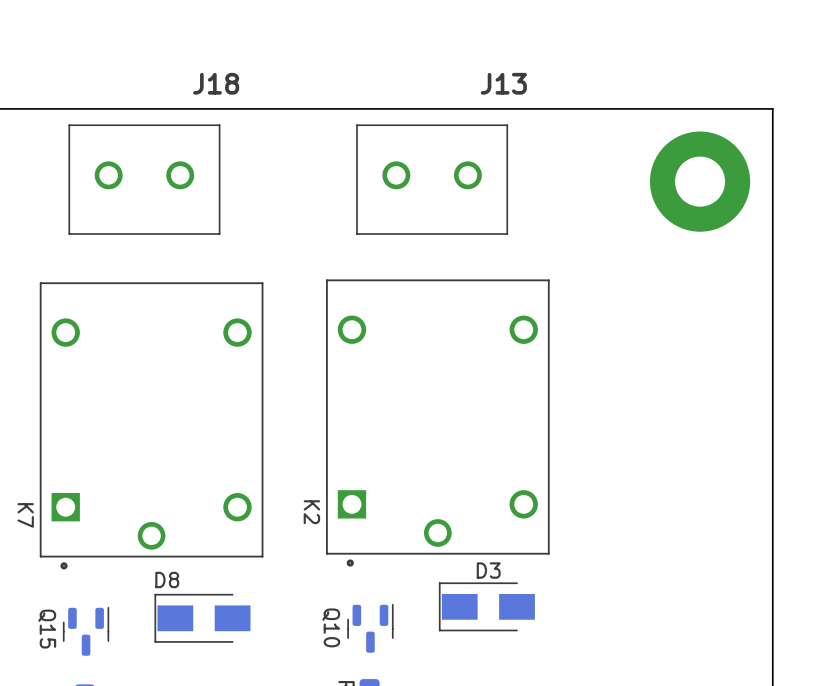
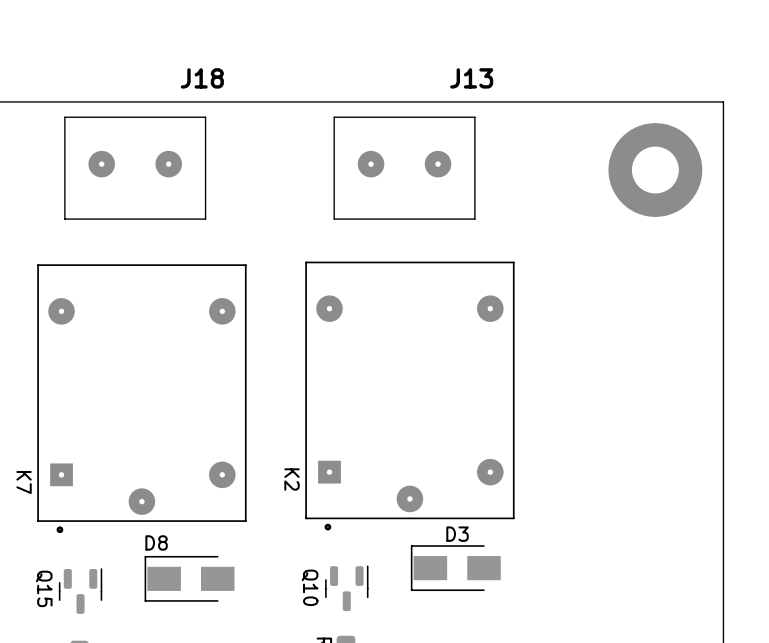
J18 footprint: [68, 124, 221, 235] -> [64, 116, 207, 220]
J13 footprint: [356, 124, 508, 235] -> [333, 116, 476, 220]
K2 footprint: [326, 279, 550, 567] -> [305, 261, 515, 531]
K7 footprint: [39, 282, 264, 570] -> [37, 264, 247, 534]

